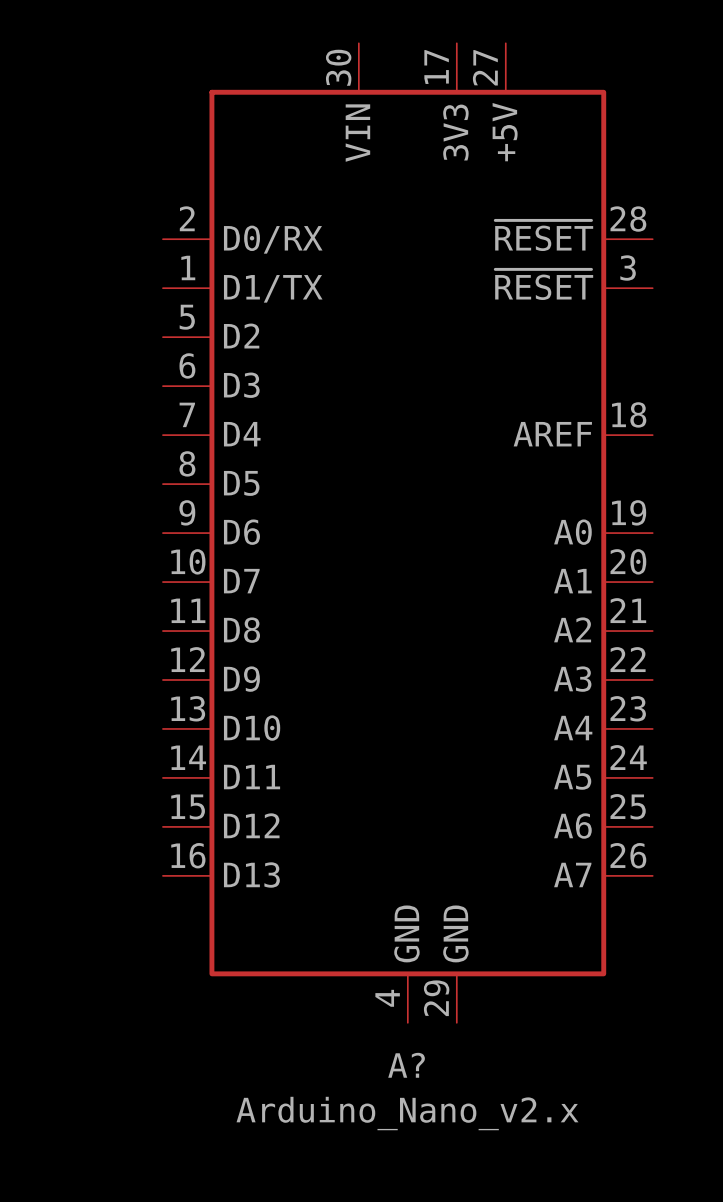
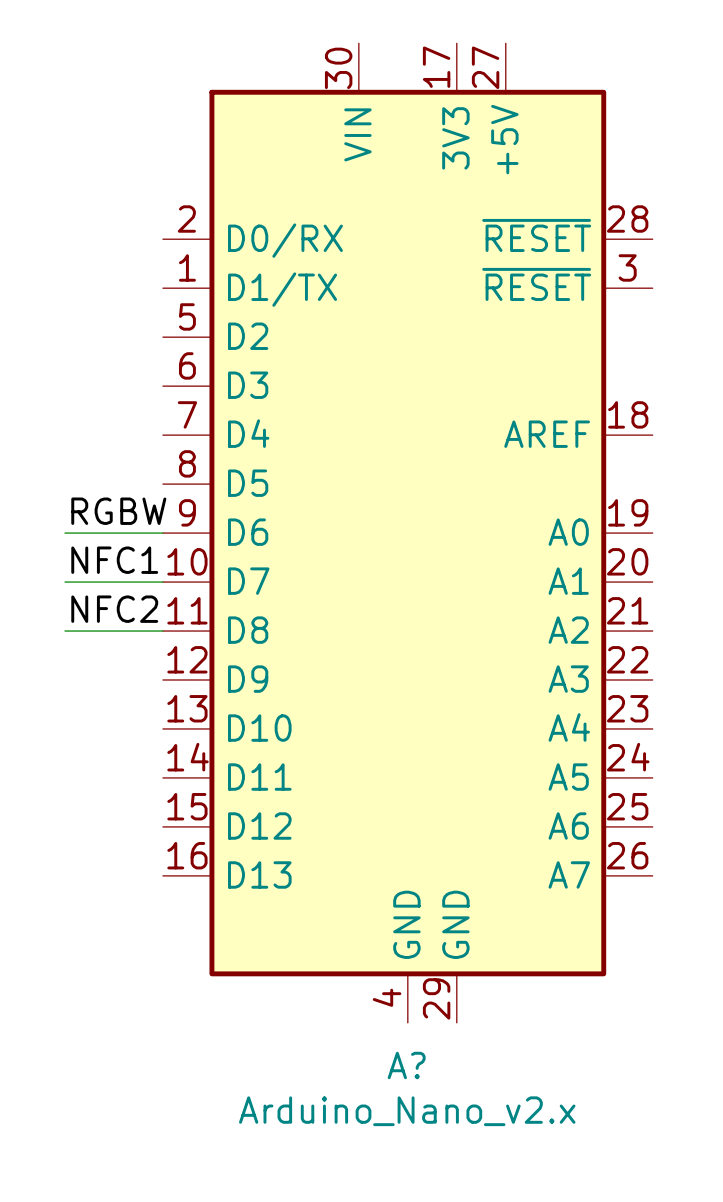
label: none -> RGBW (118, 511)
wire: none -> (64, 533) (162, 533)
label: none -> NFC1 (114, 560)
wire: none -> (64, 582) (162, 582)
label: none -> NFC2 (114, 609)
wire: none -> (64, 631) (162, 631)

